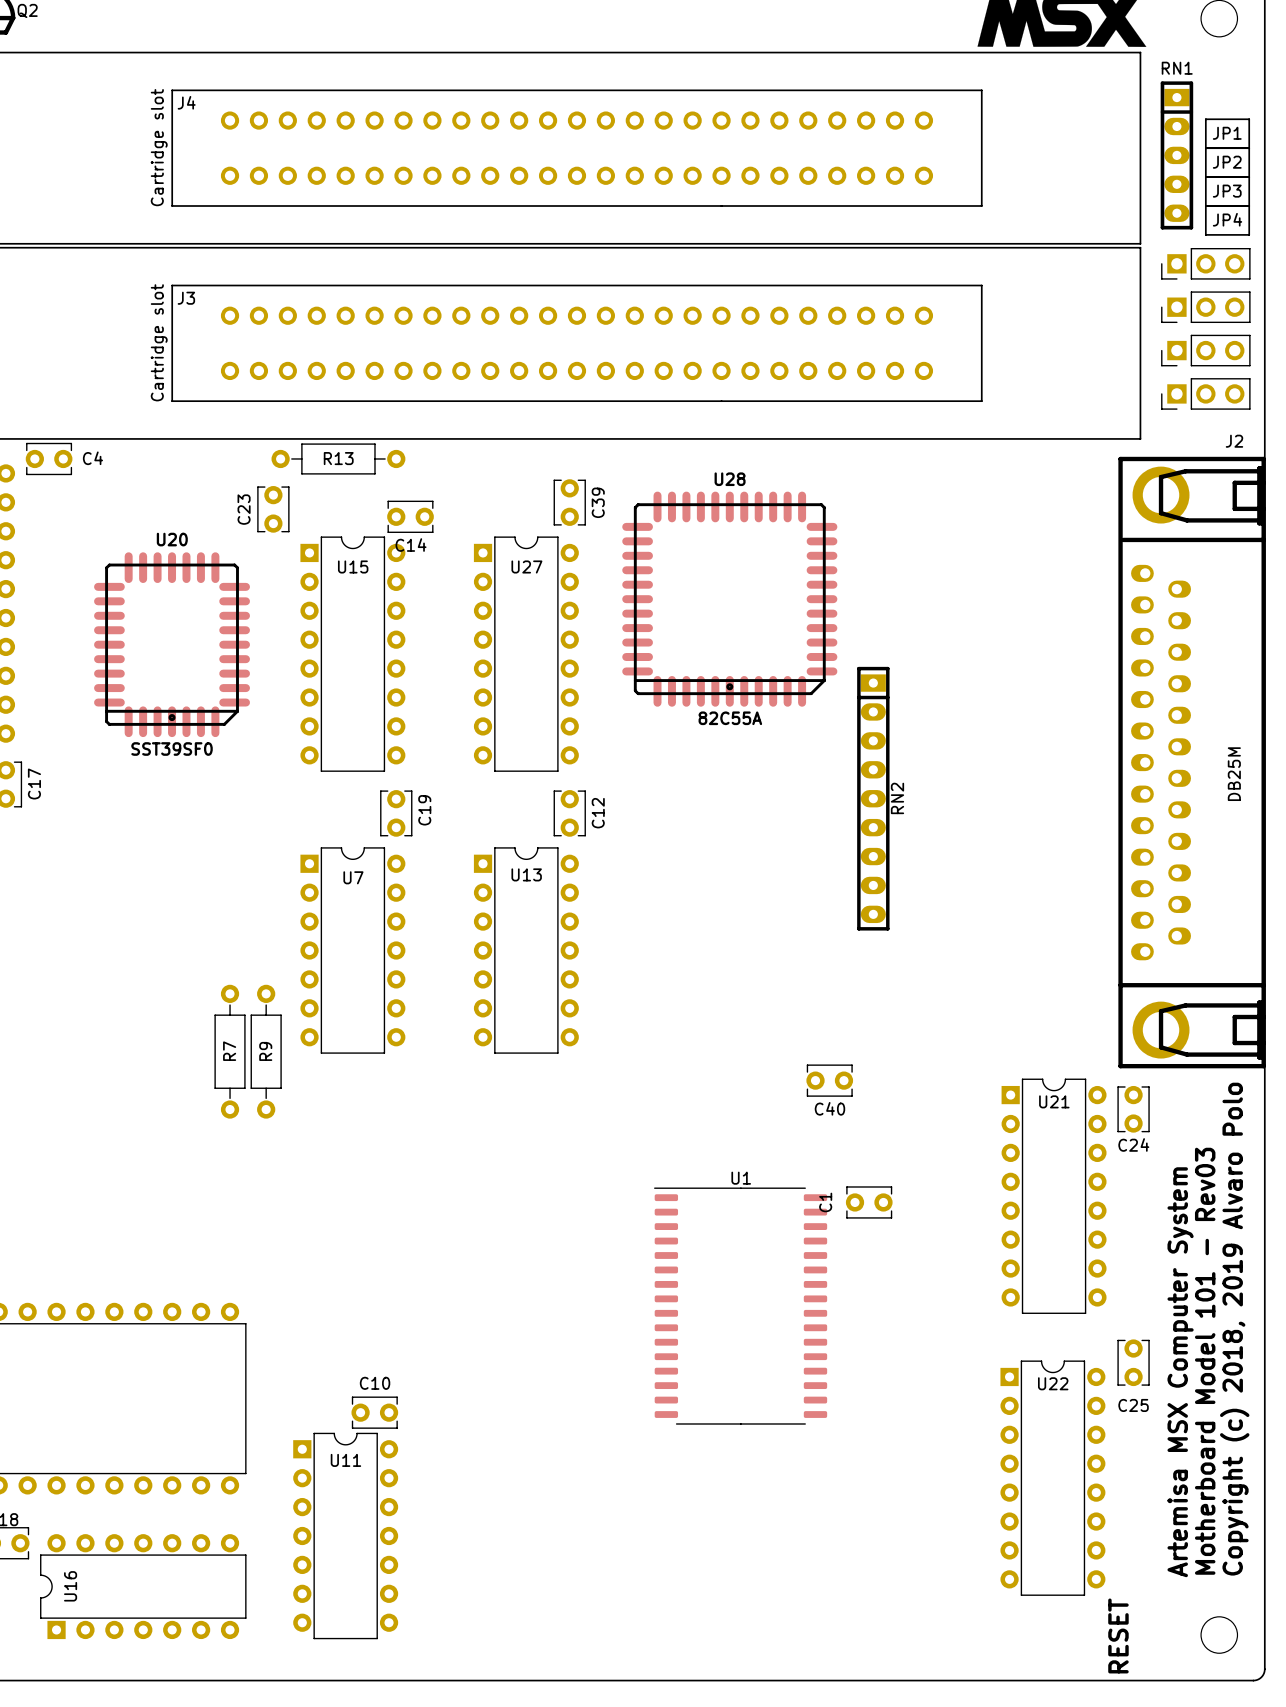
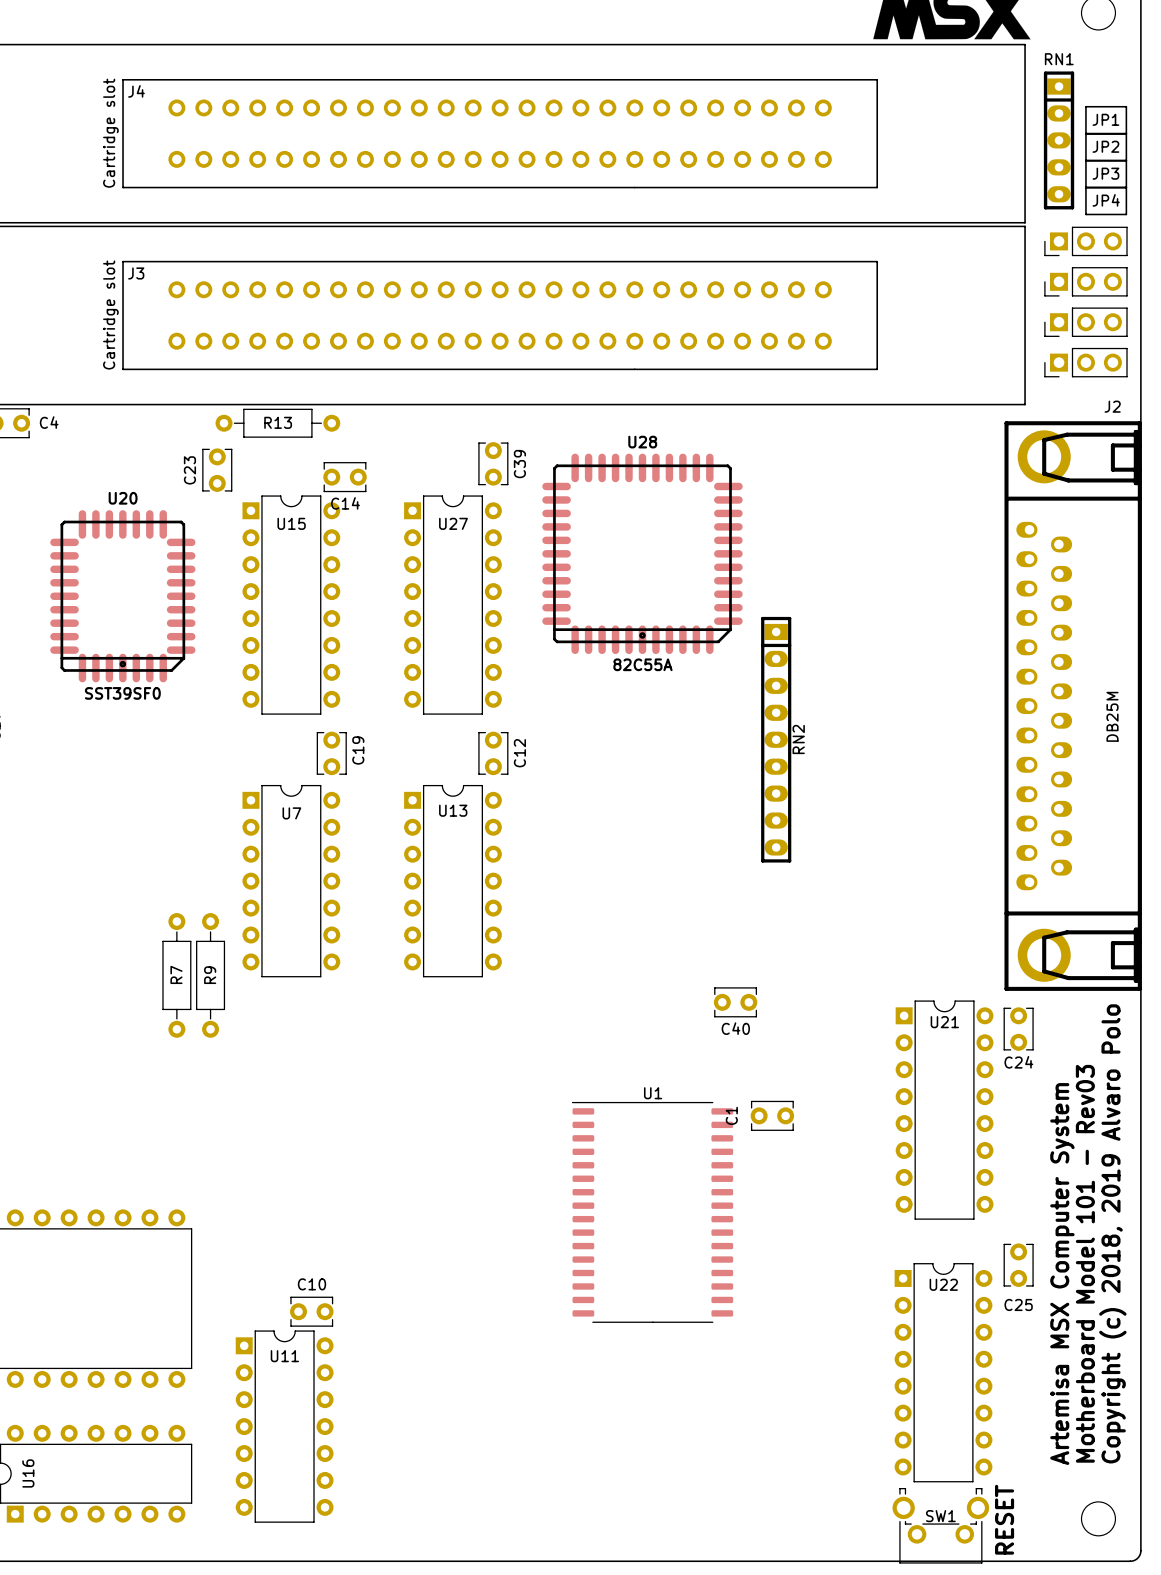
SW1: none -> (940, 1525)

